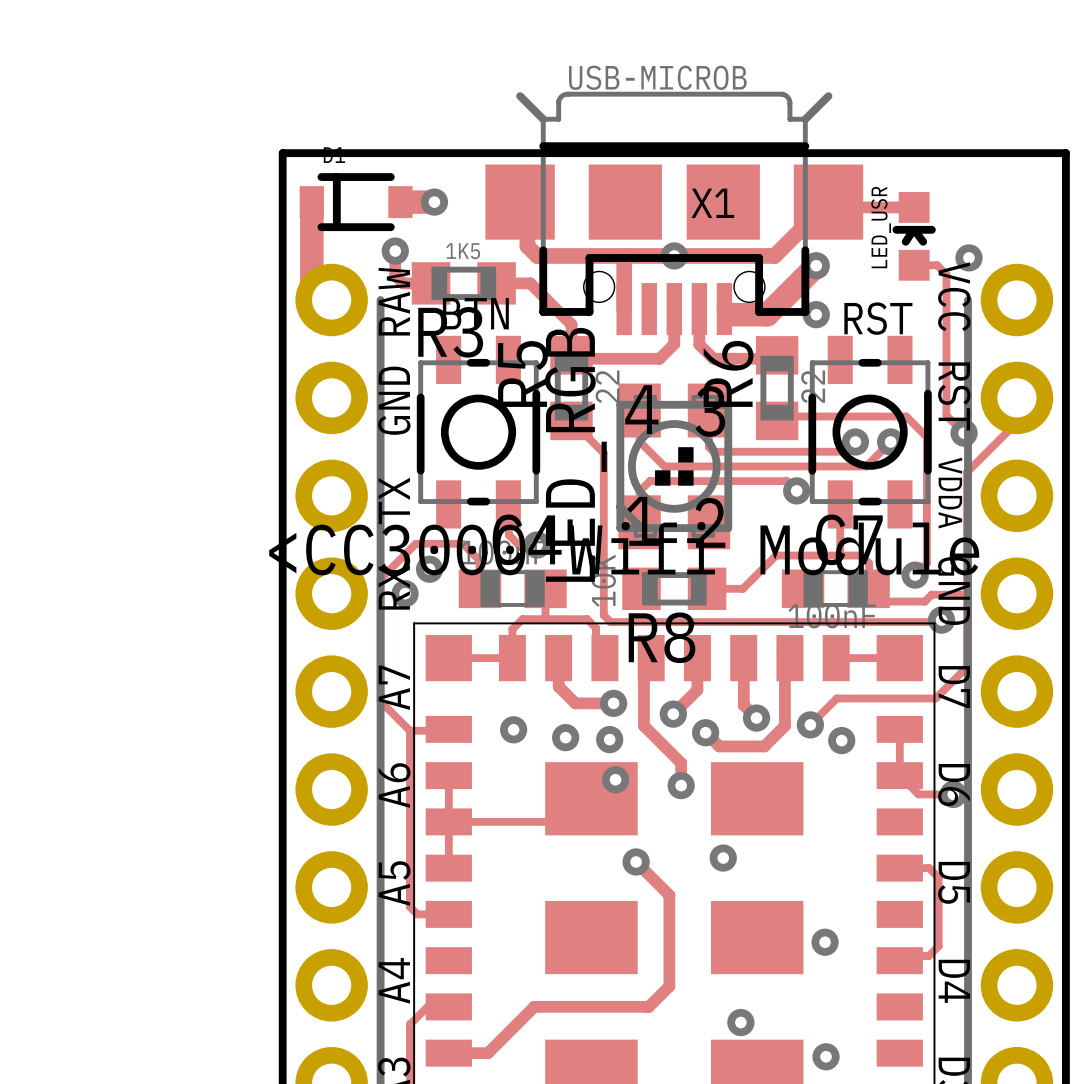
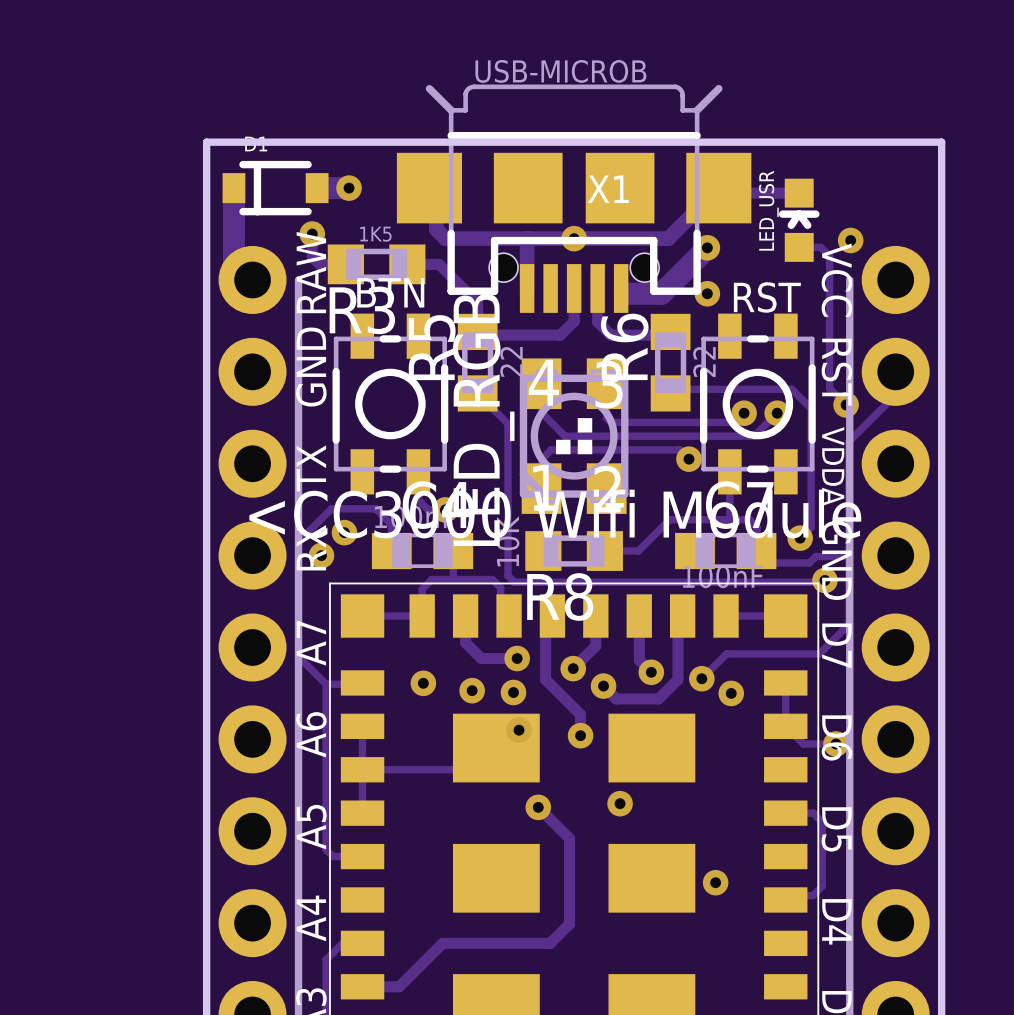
via: (740, 1022) -> none
via: (826, 1056) -> none

